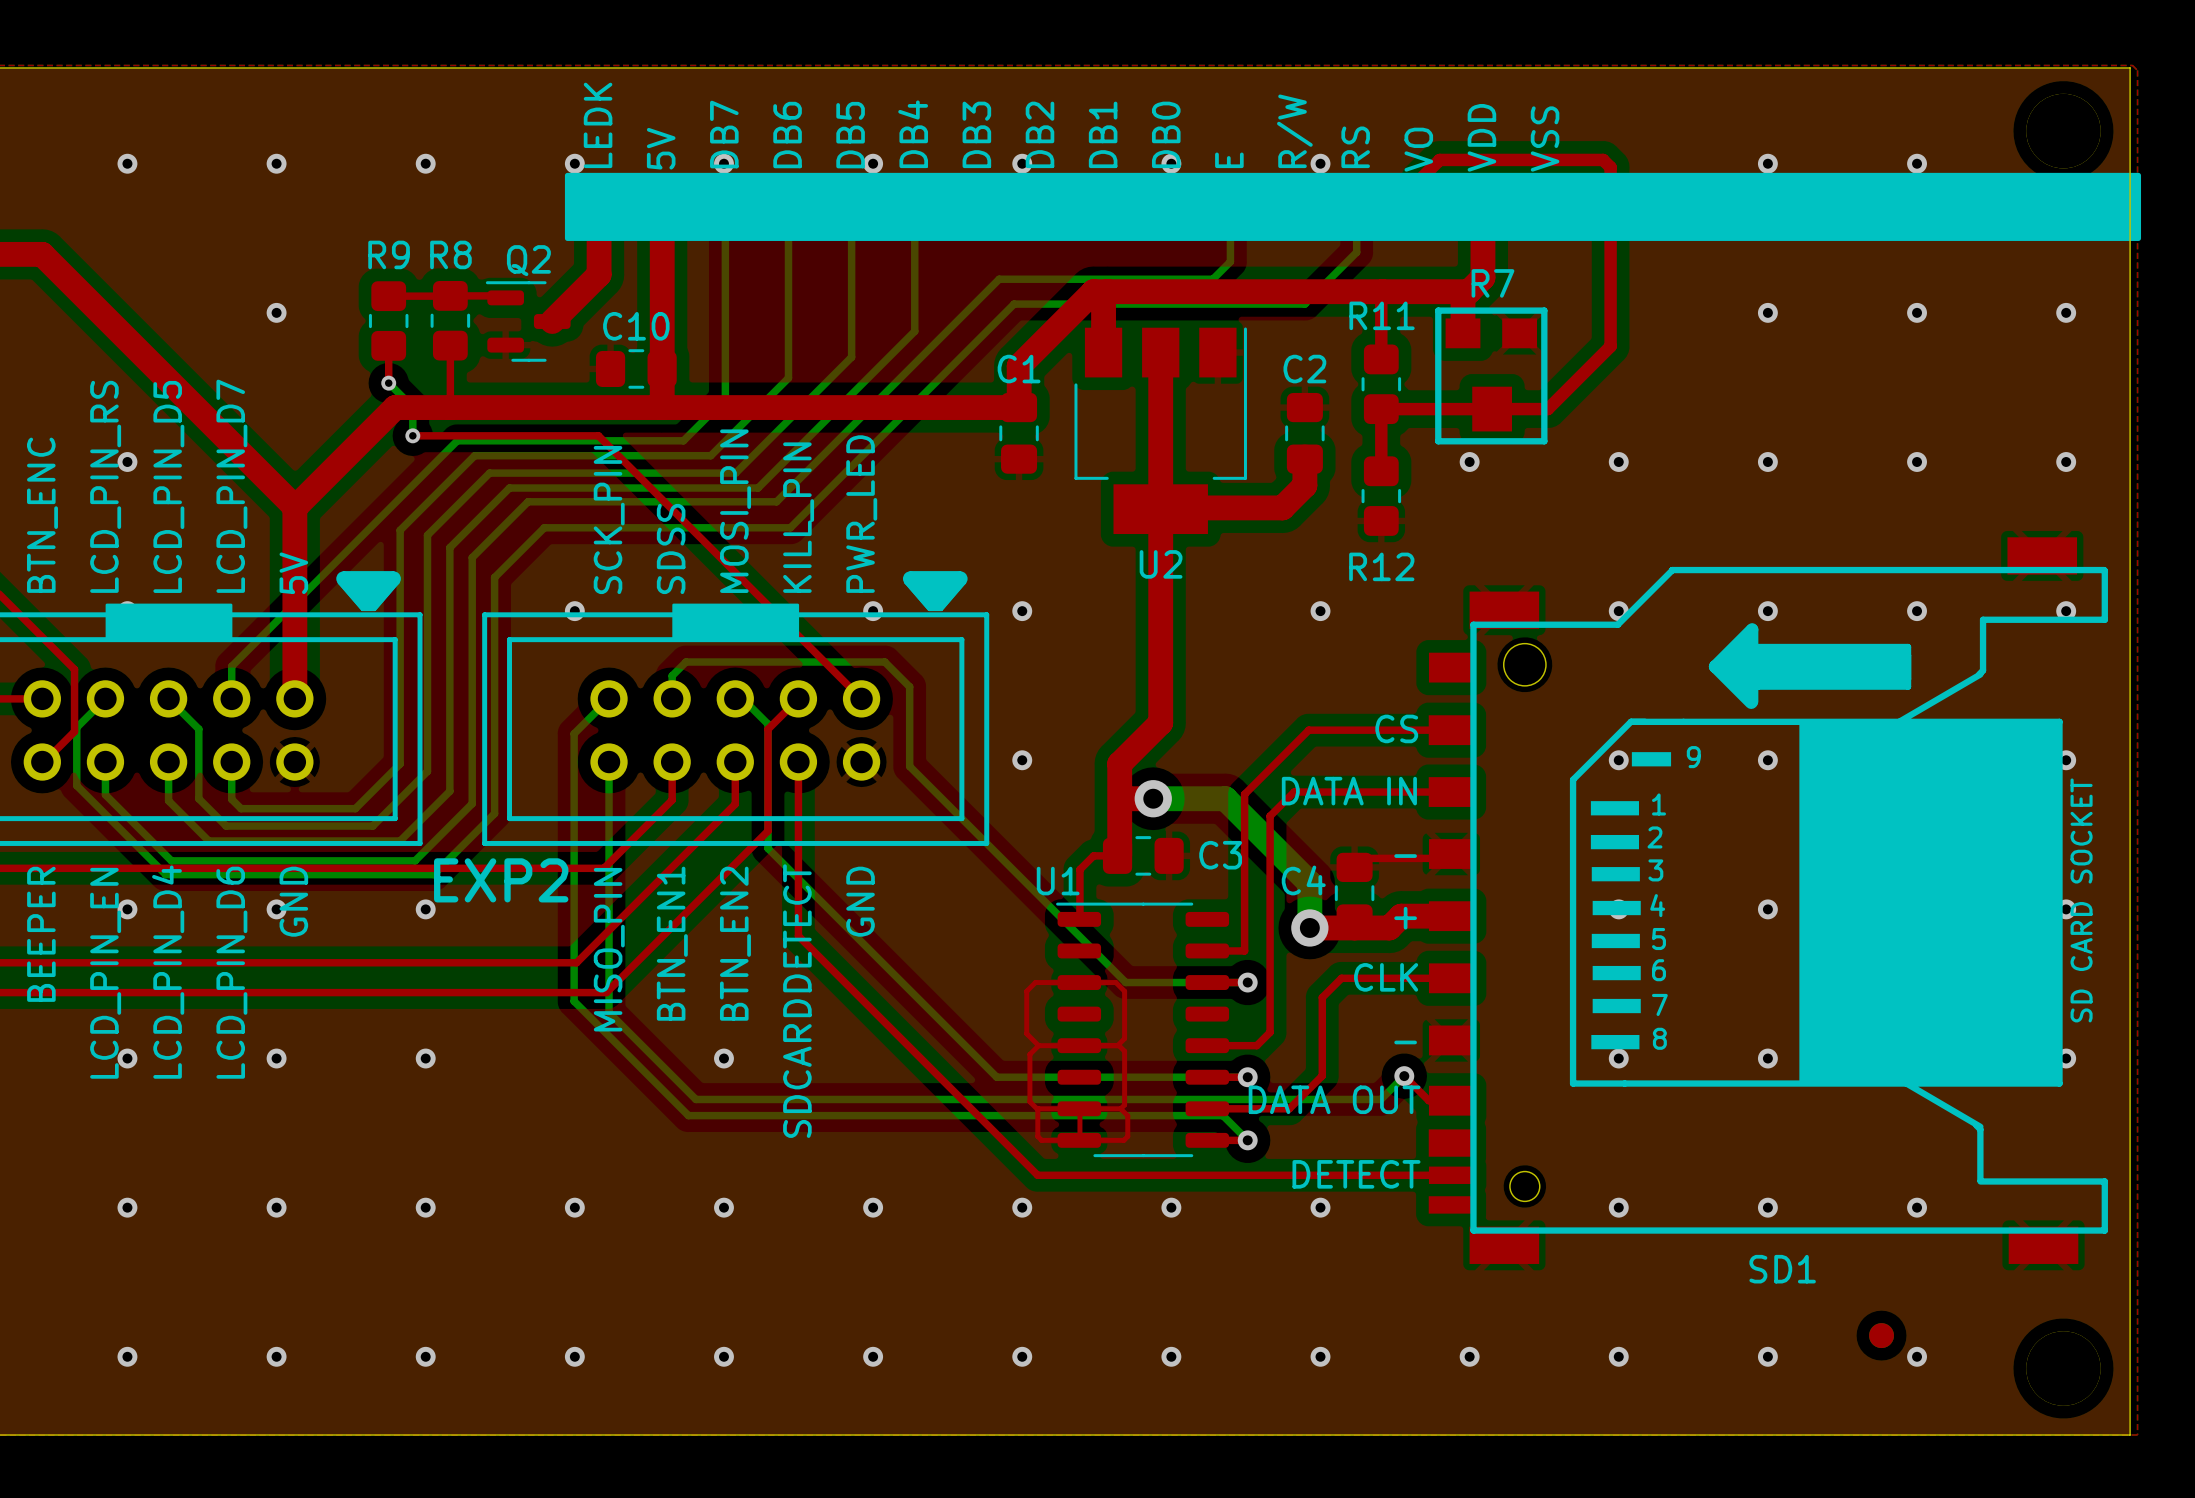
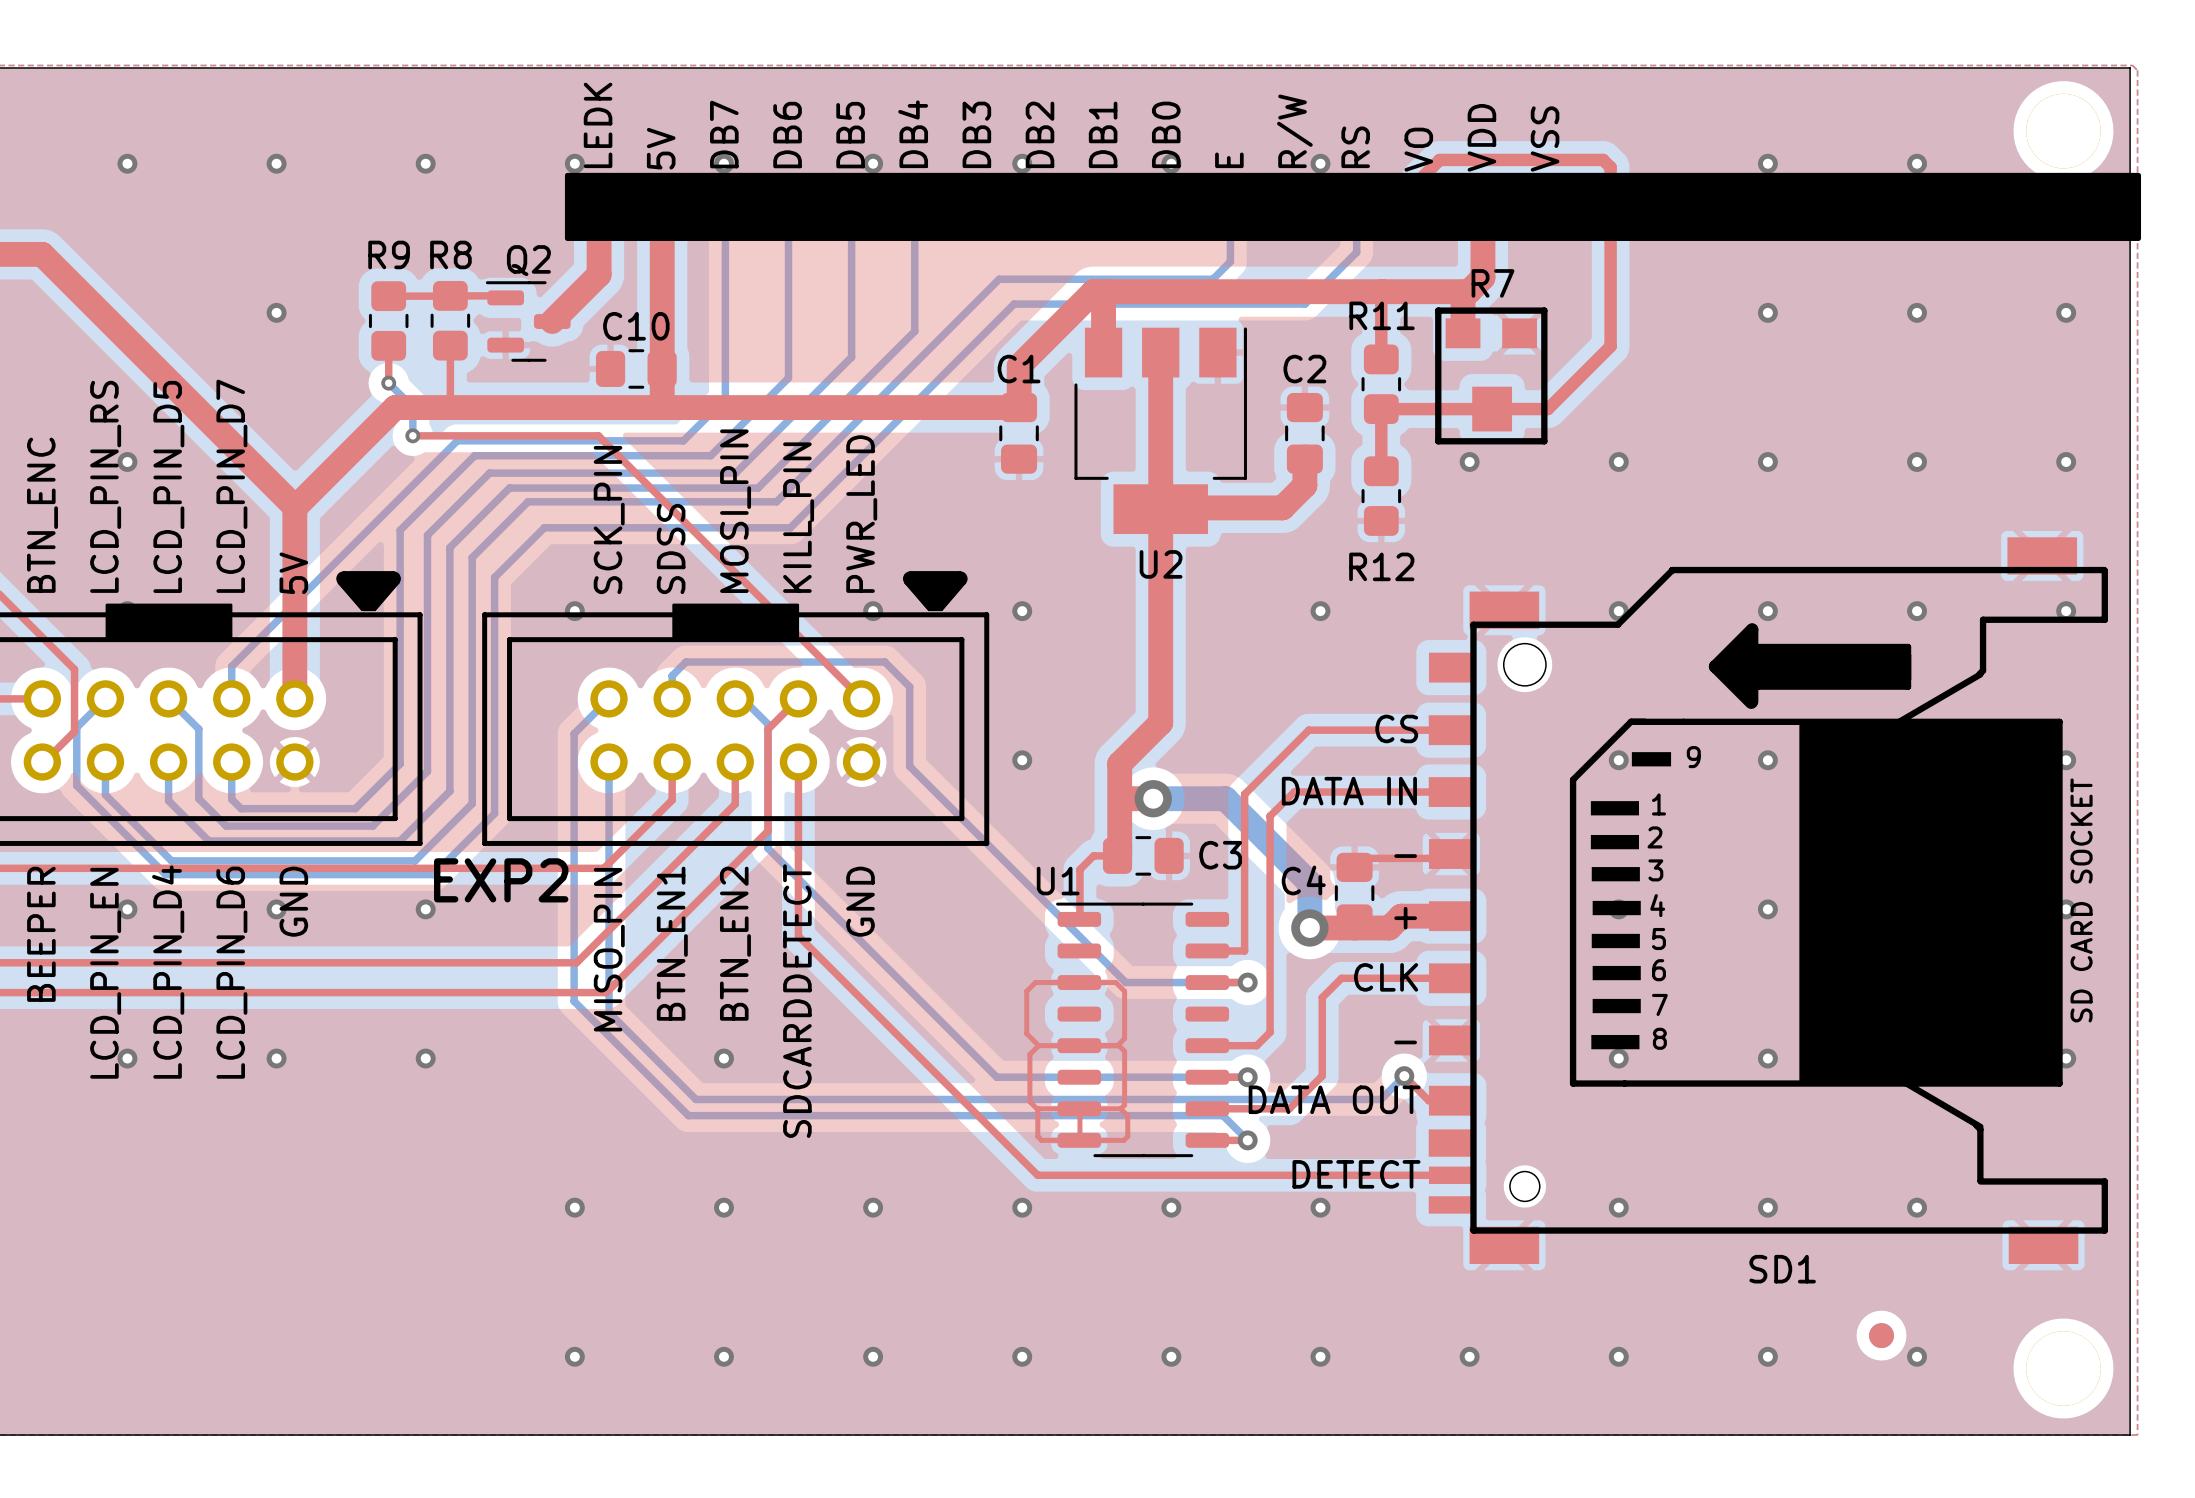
via: (127, 1207) -> none
via: (276, 1207) -> none
via: (425, 1207) -> none
via: (127, 1356) -> none
via: (276, 1356) -> none
via: (425, 1356) -> none

